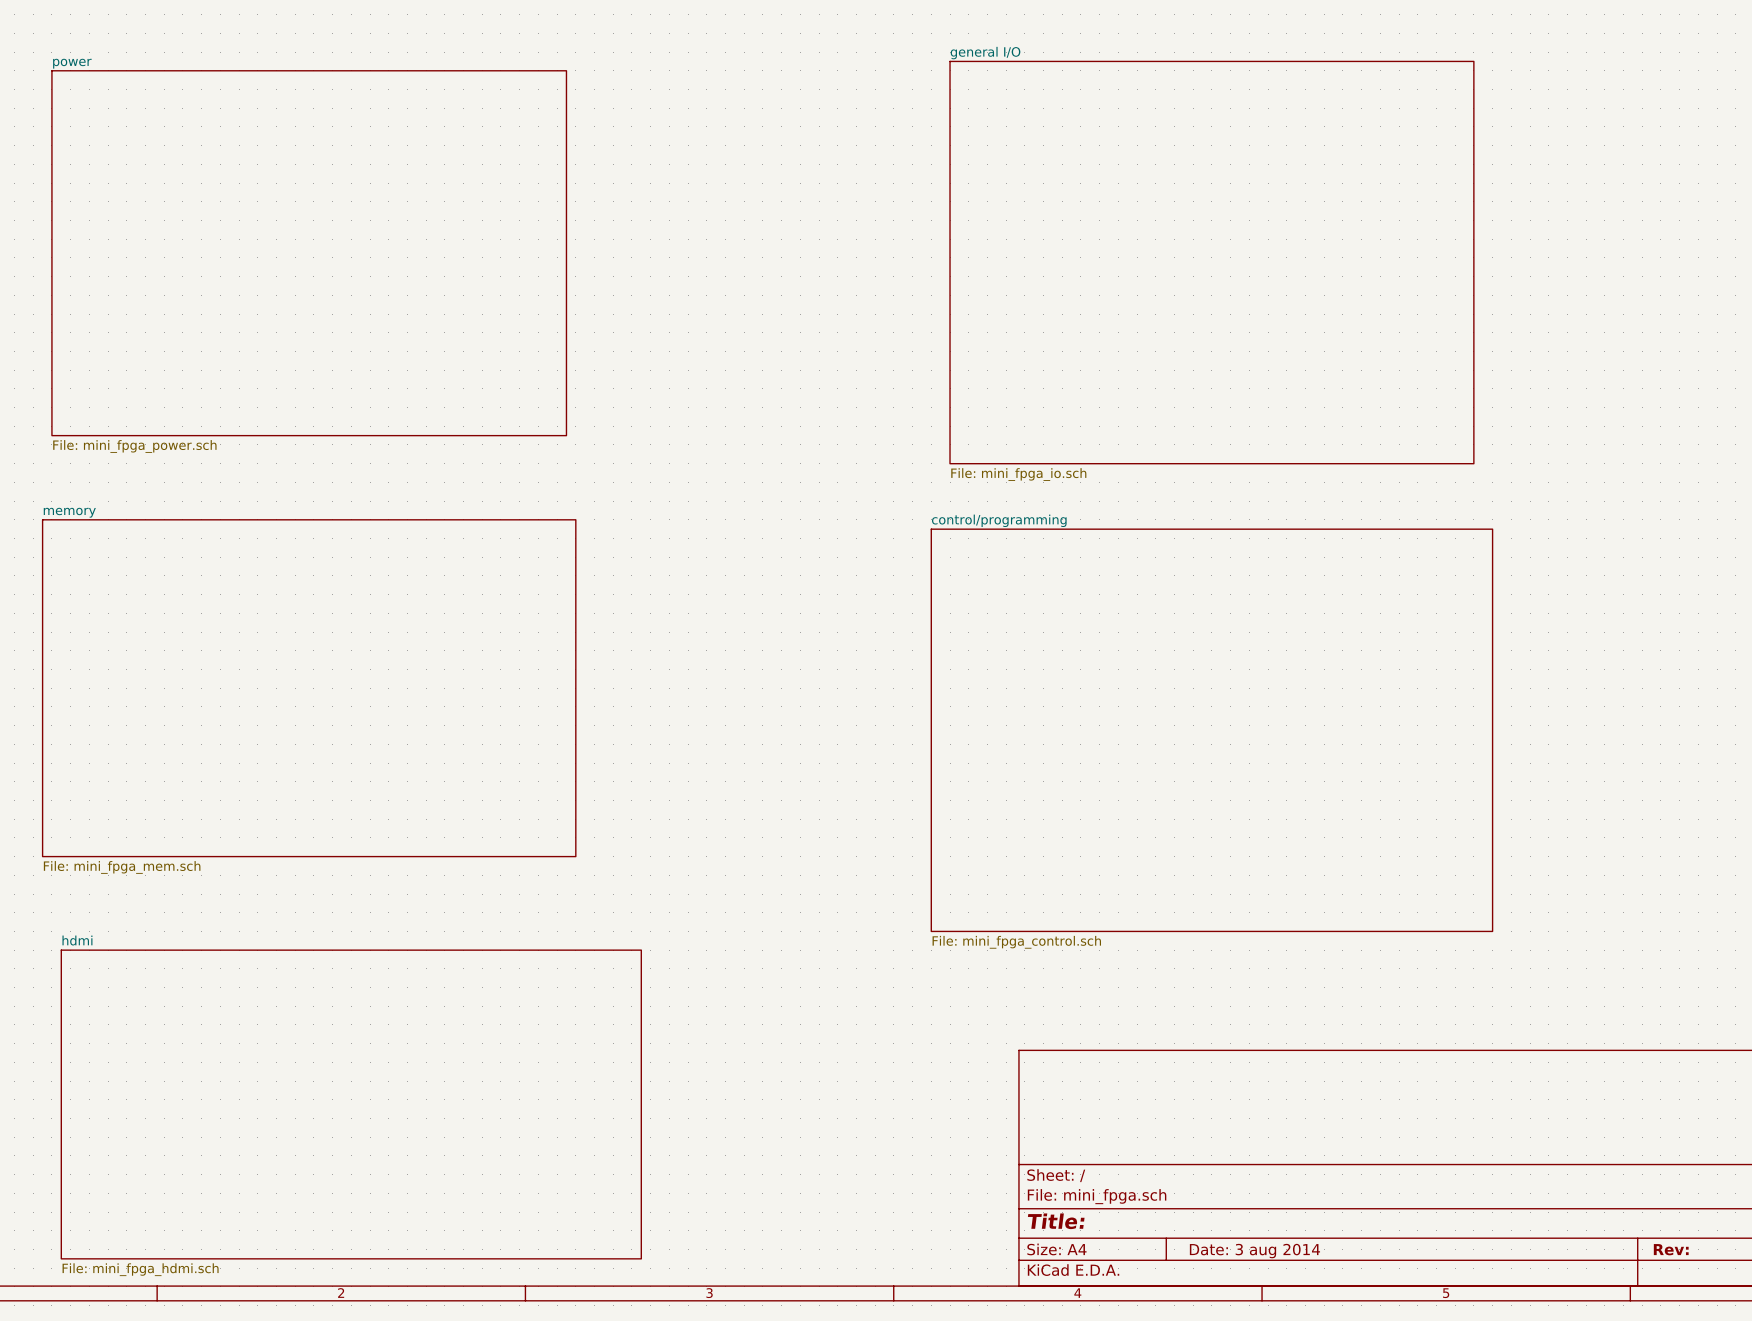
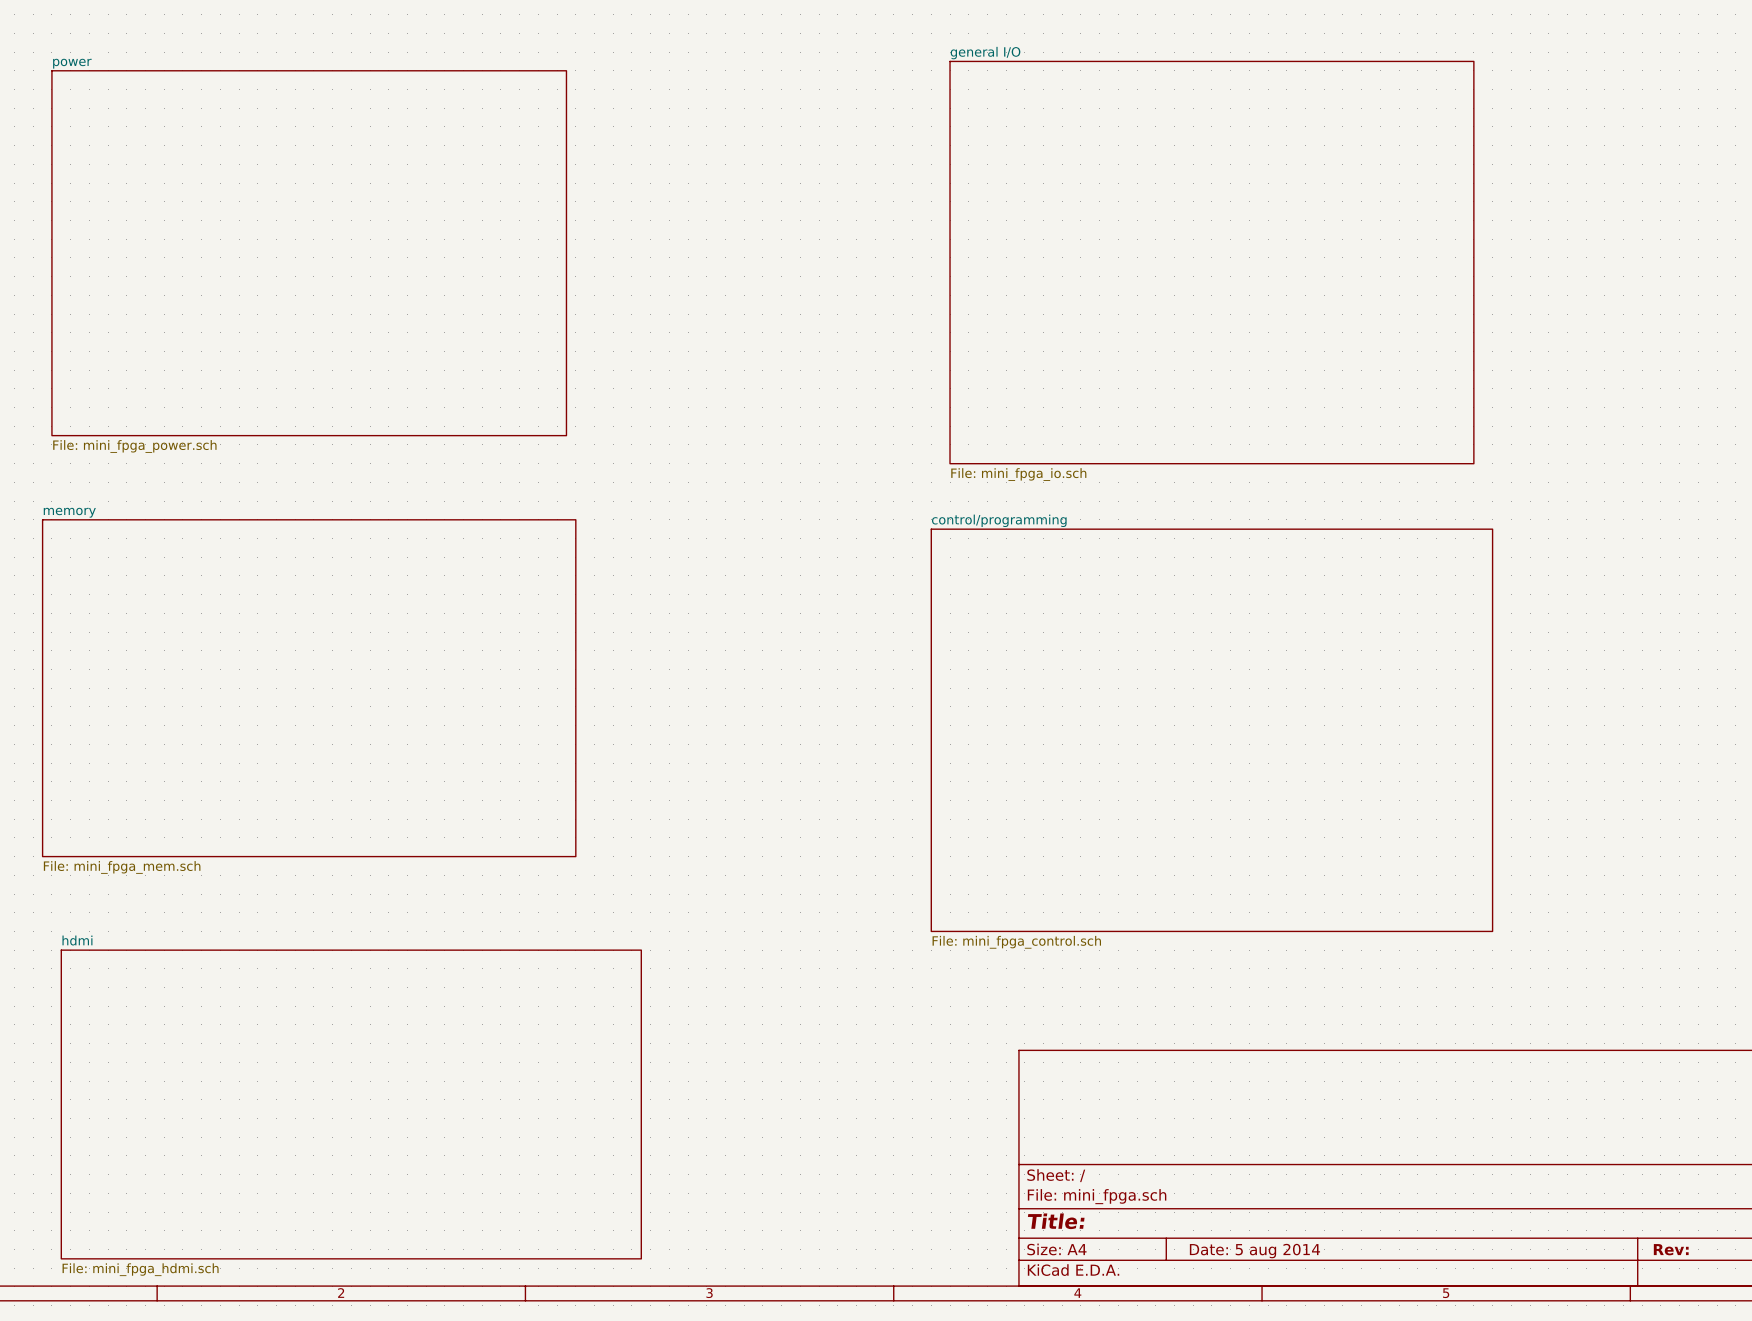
title block: Date: 3 aug 2014 (1254, 1251) -> Date: 5 aug 2014 (1254, 1251)

